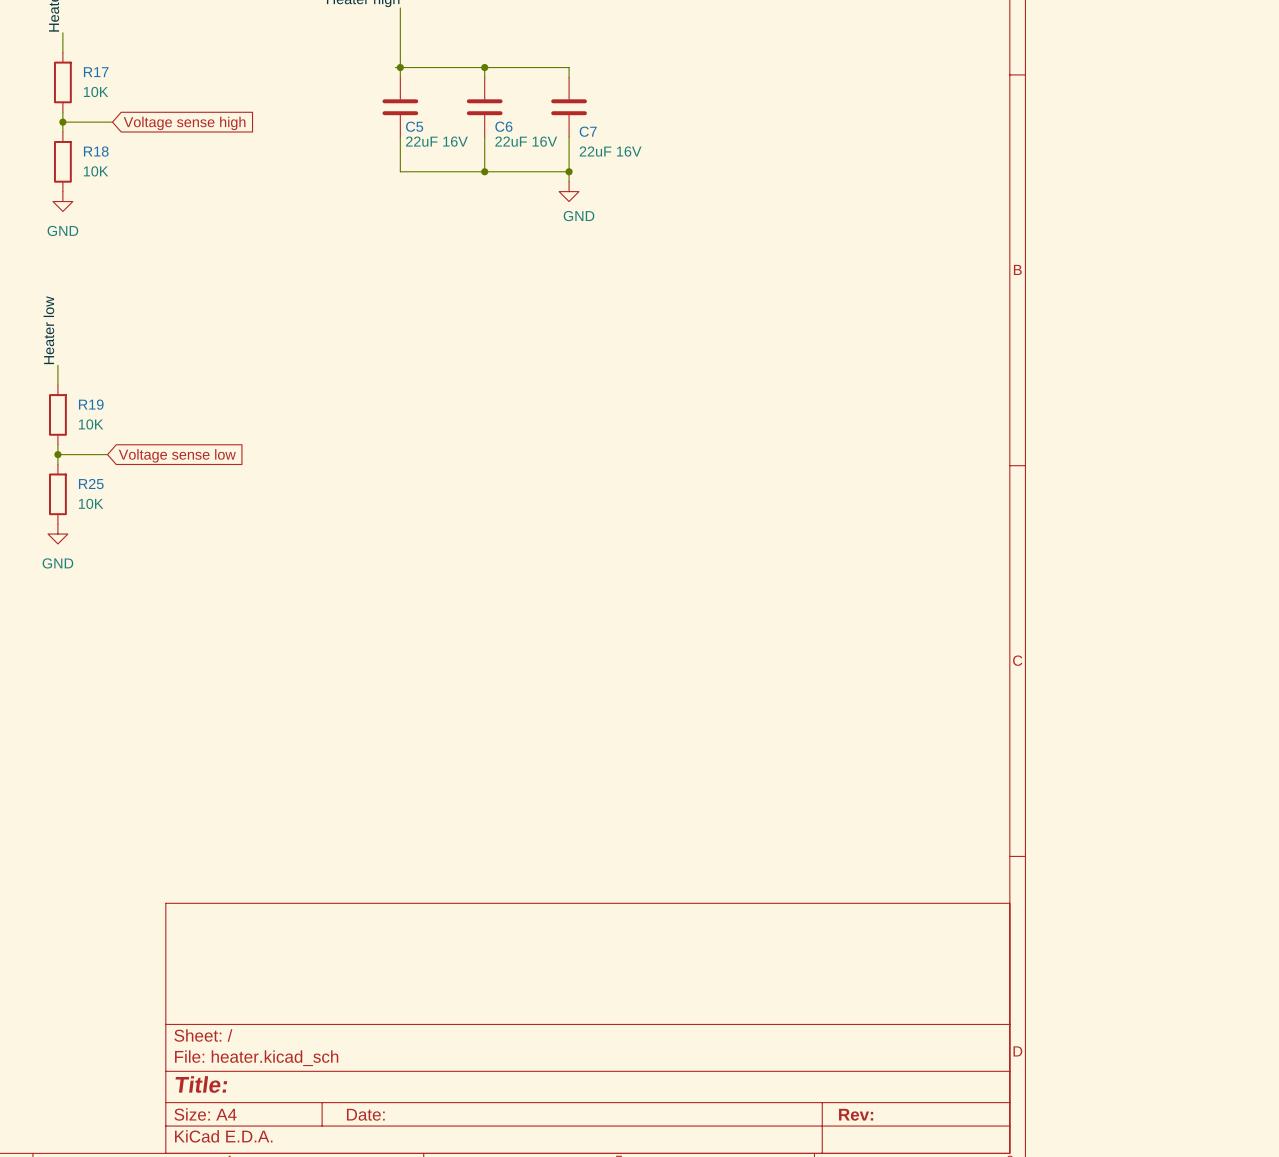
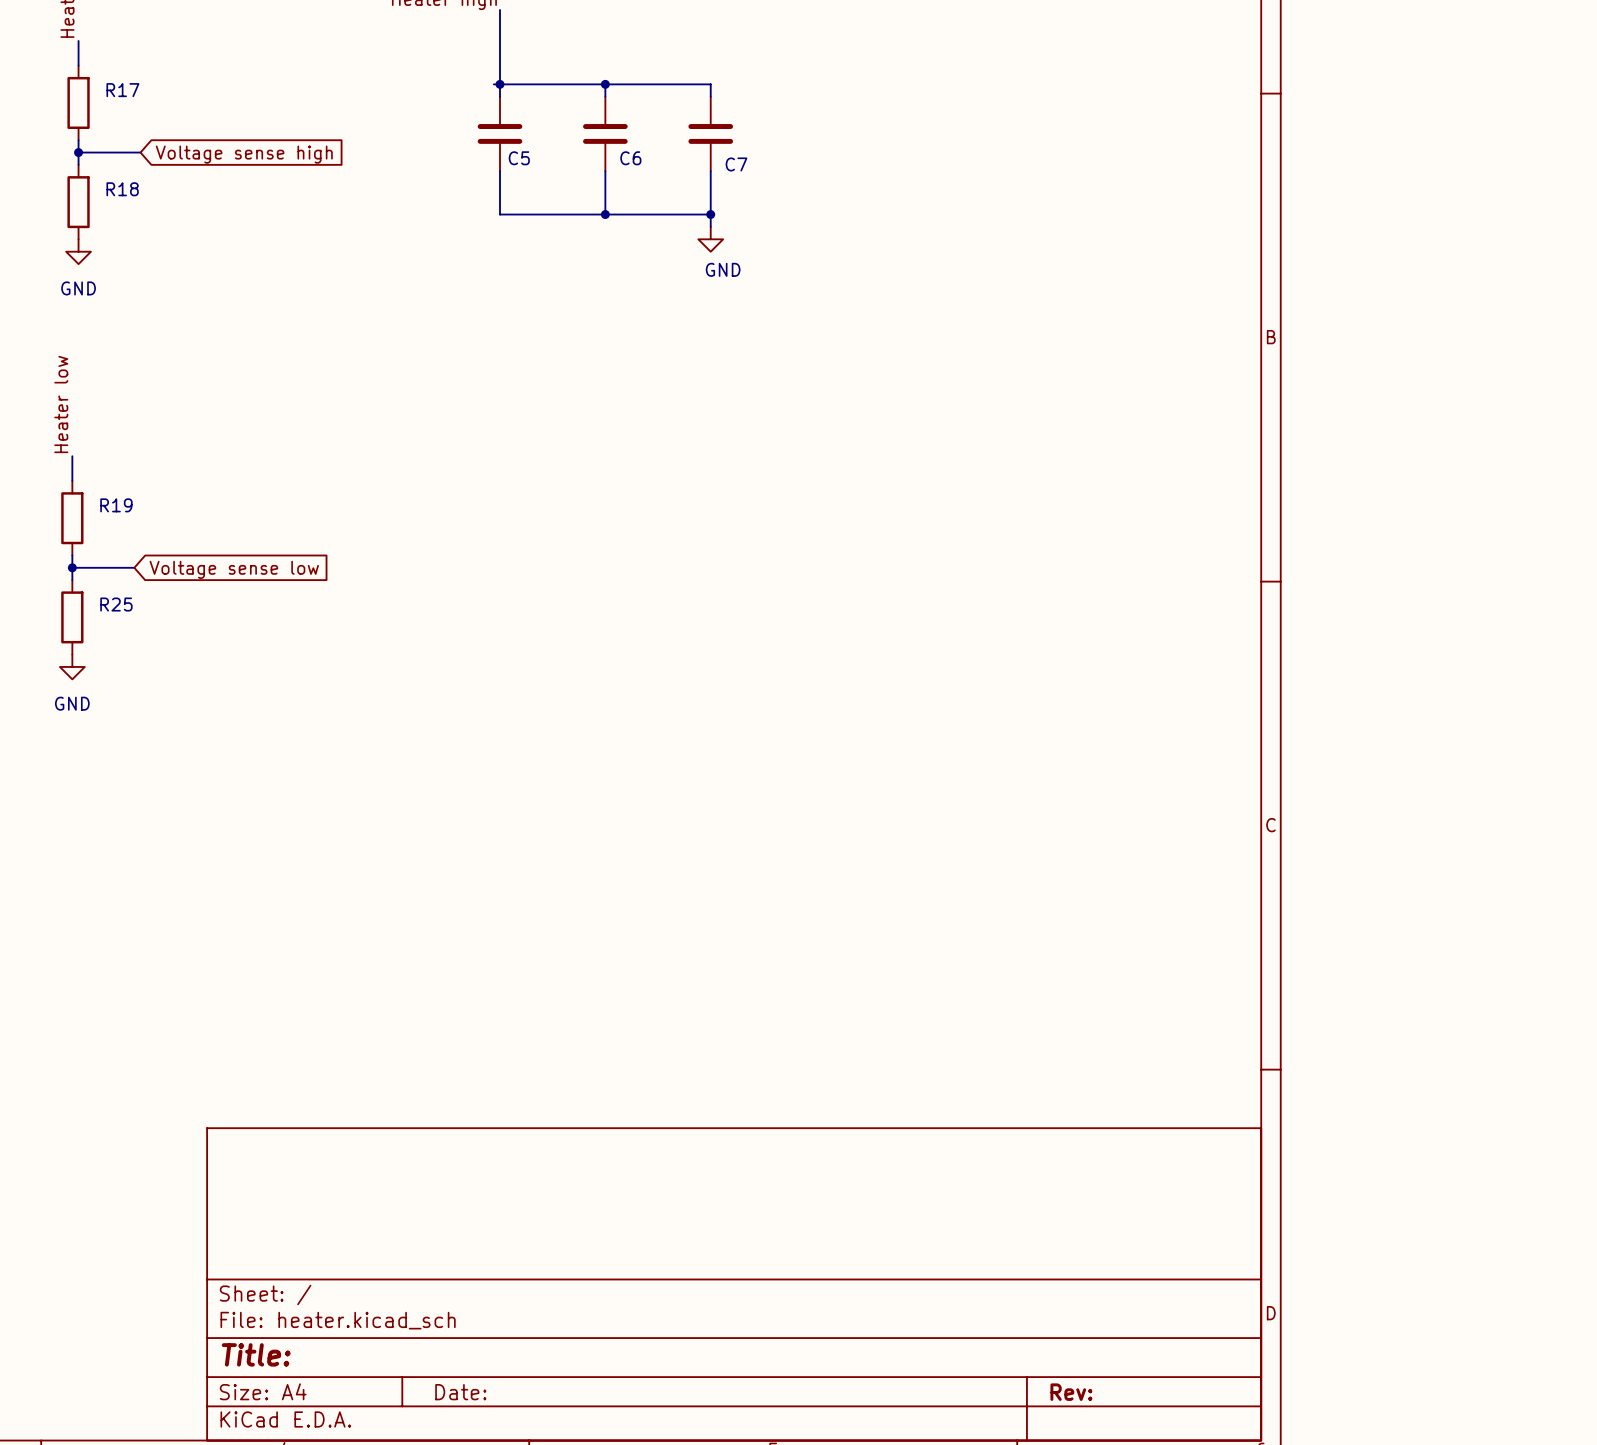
R17 value: 10K (96, 91) -> none
C5 value: 22uF 16V (436, 141) -> none
C6 value: 22uF 16V (526, 141) -> none
C7 value: 22uF 16V (610, 151) -> none
R18 value: 10K (96, 171) -> none
R19 value: 10K (91, 424) -> none
R25 value: 10K (91, 503) -> none

